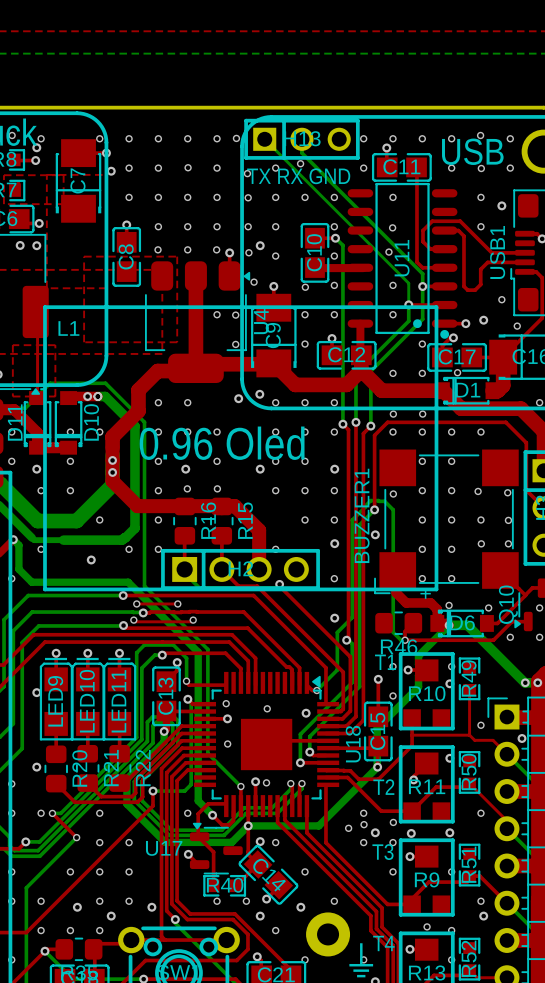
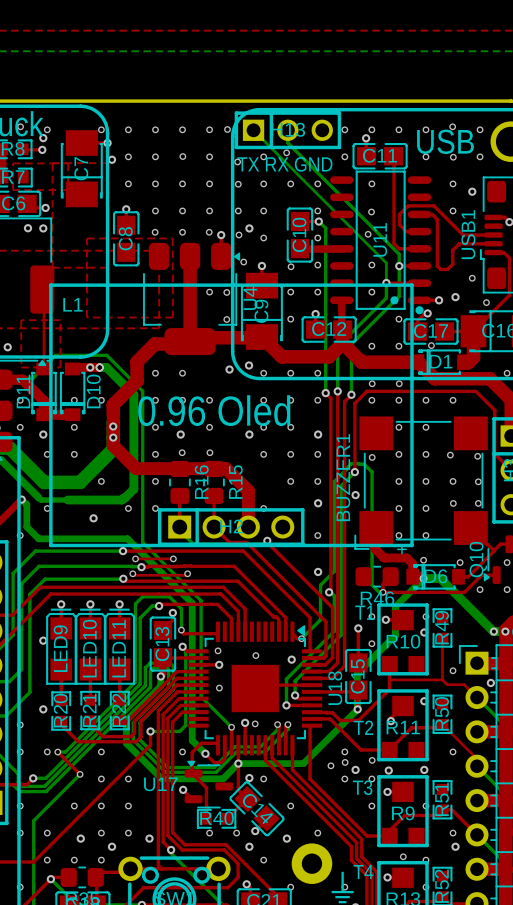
R21 footprint: [76, 744, 100, 792] -> [80, 690, 101, 731]
R22 footprint: [107, 744, 132, 792] -> [109, 690, 130, 731]
R20 footprint: [44, 745, 68, 793] -> [51, 691, 72, 731]

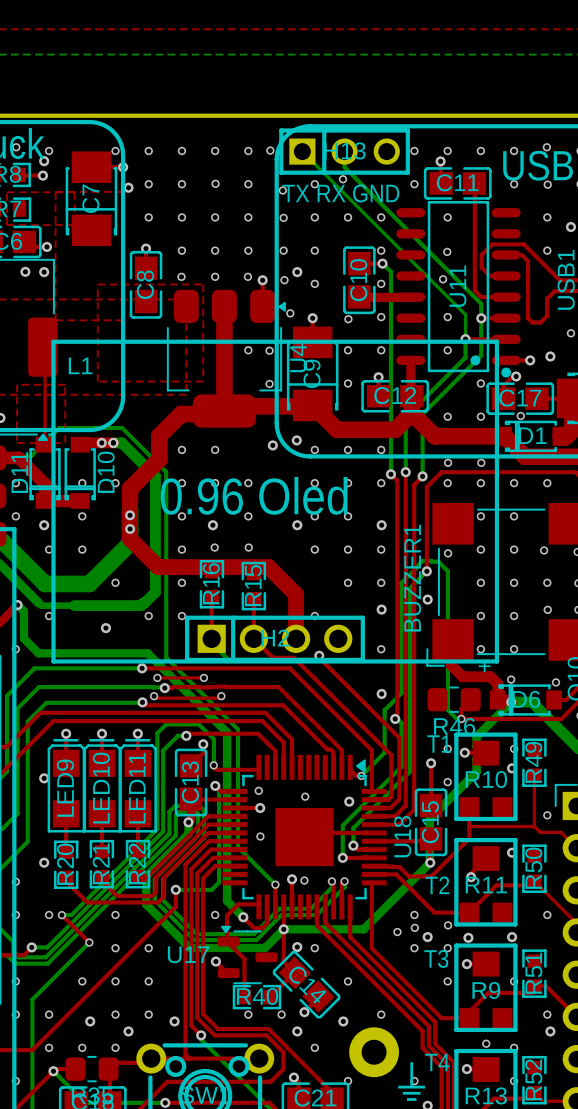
R16 footprint: [169, 460, 191, 505] -> [199, 559, 225, 609]
R15 footprint: [203, 460, 225, 505] -> [241, 561, 267, 611]

